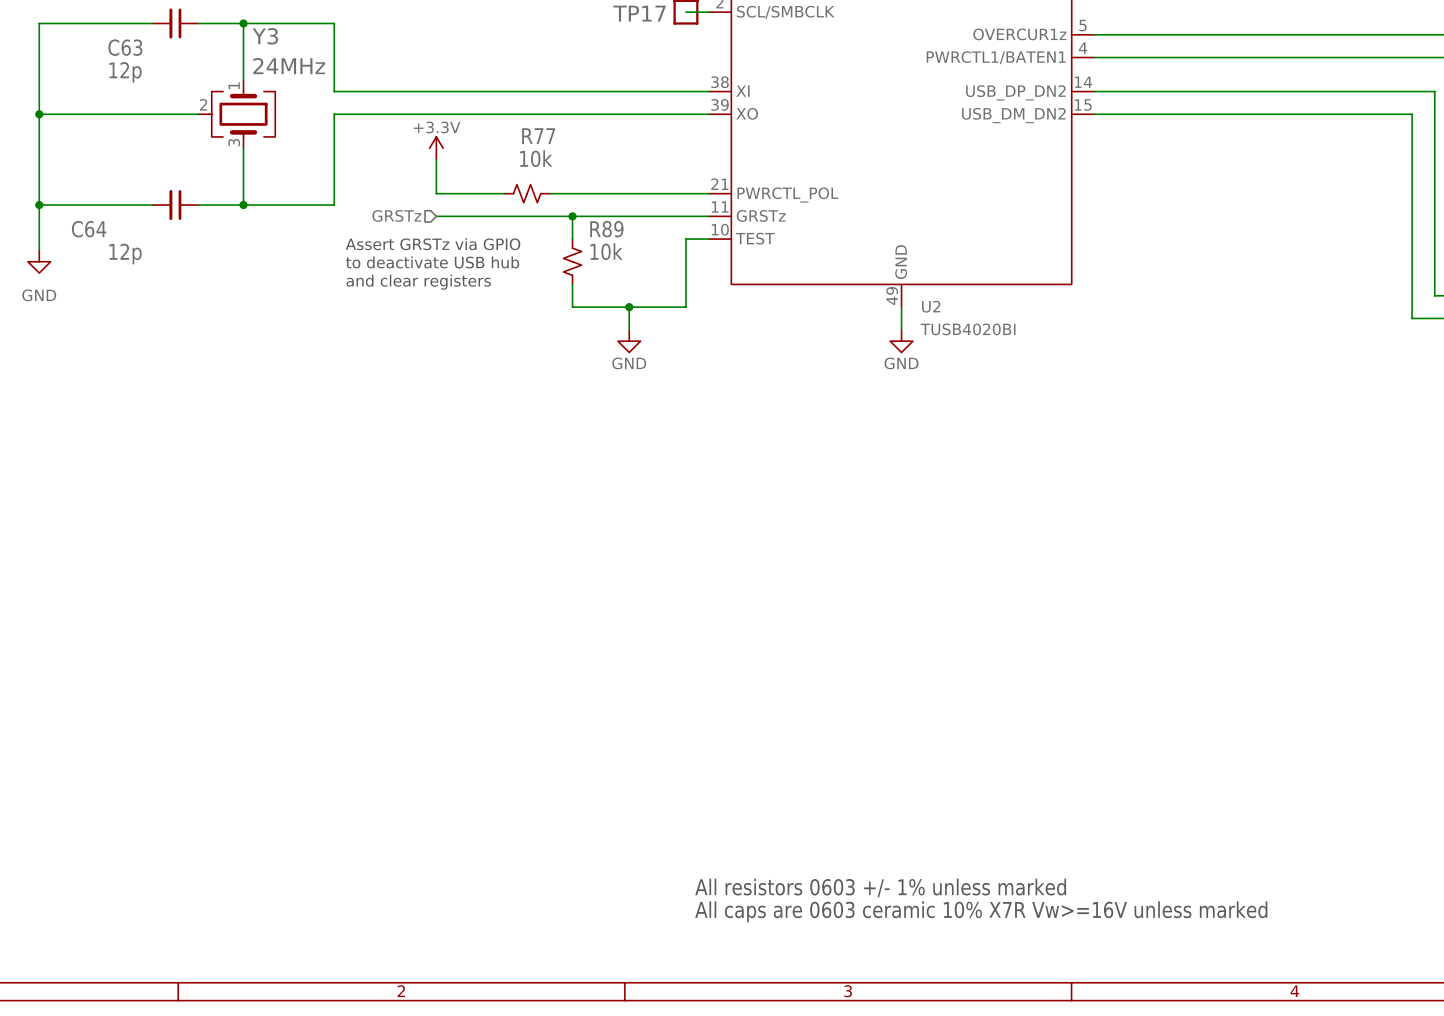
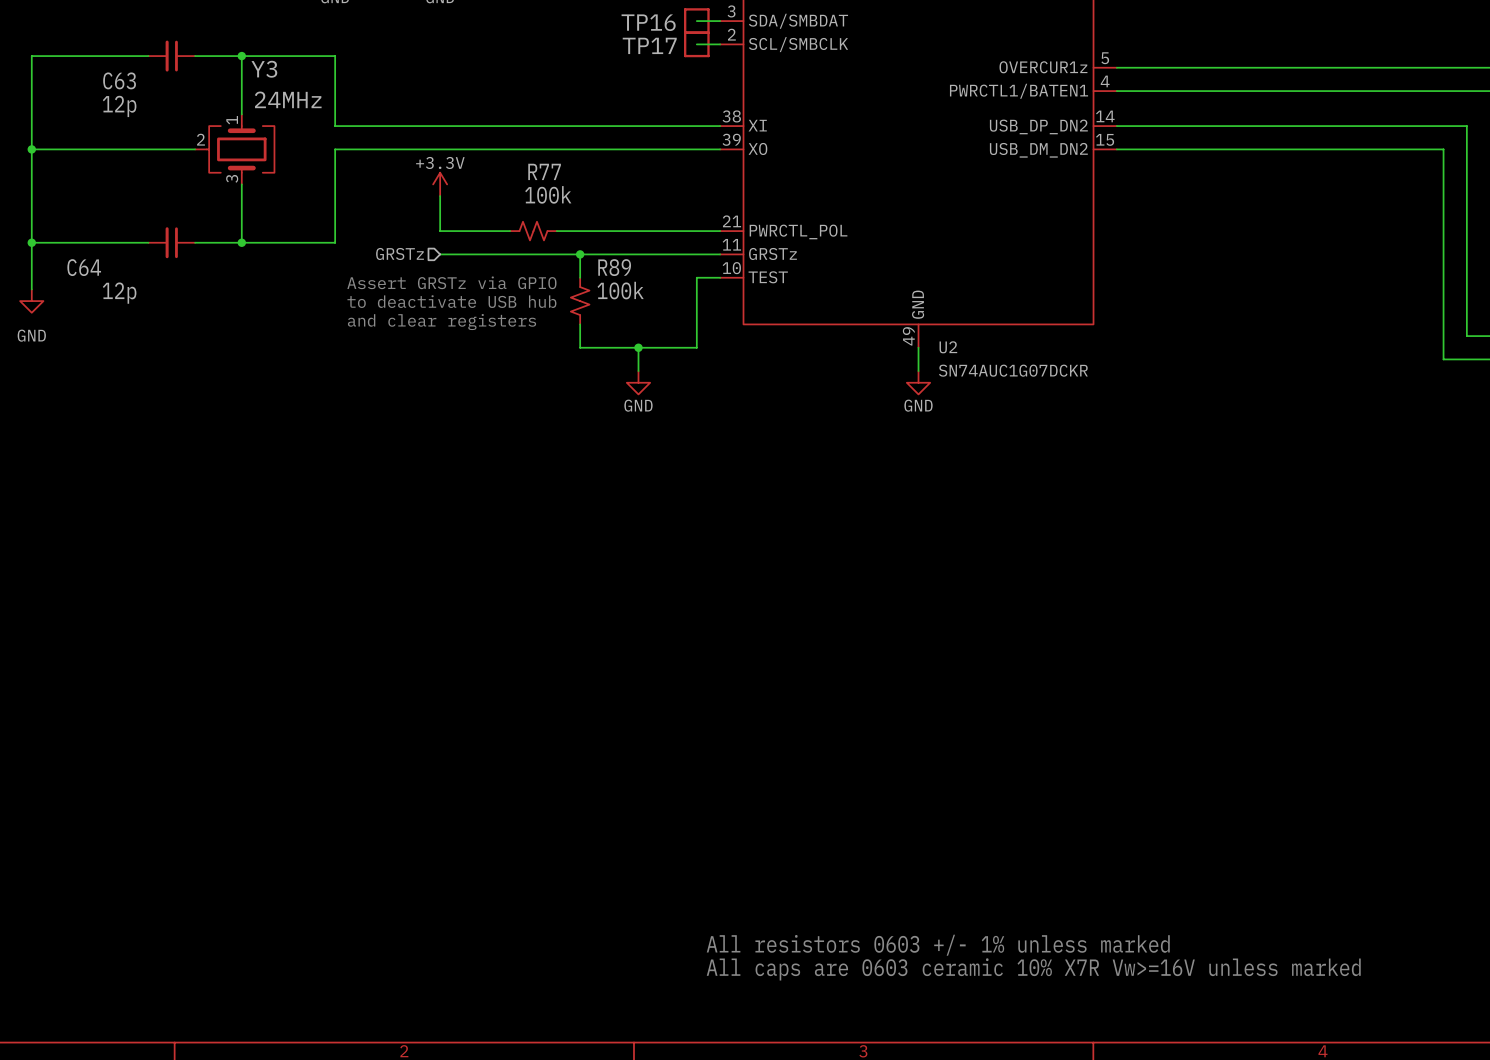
R77 value: 10k (536, 158) -> 100k (548, 194)
R89 value: 10k (606, 251) -> 100k (620, 290)
U2 value: TUSB4020BI (968, 329) -> SN74AUC1G07DCKR (1013, 370)

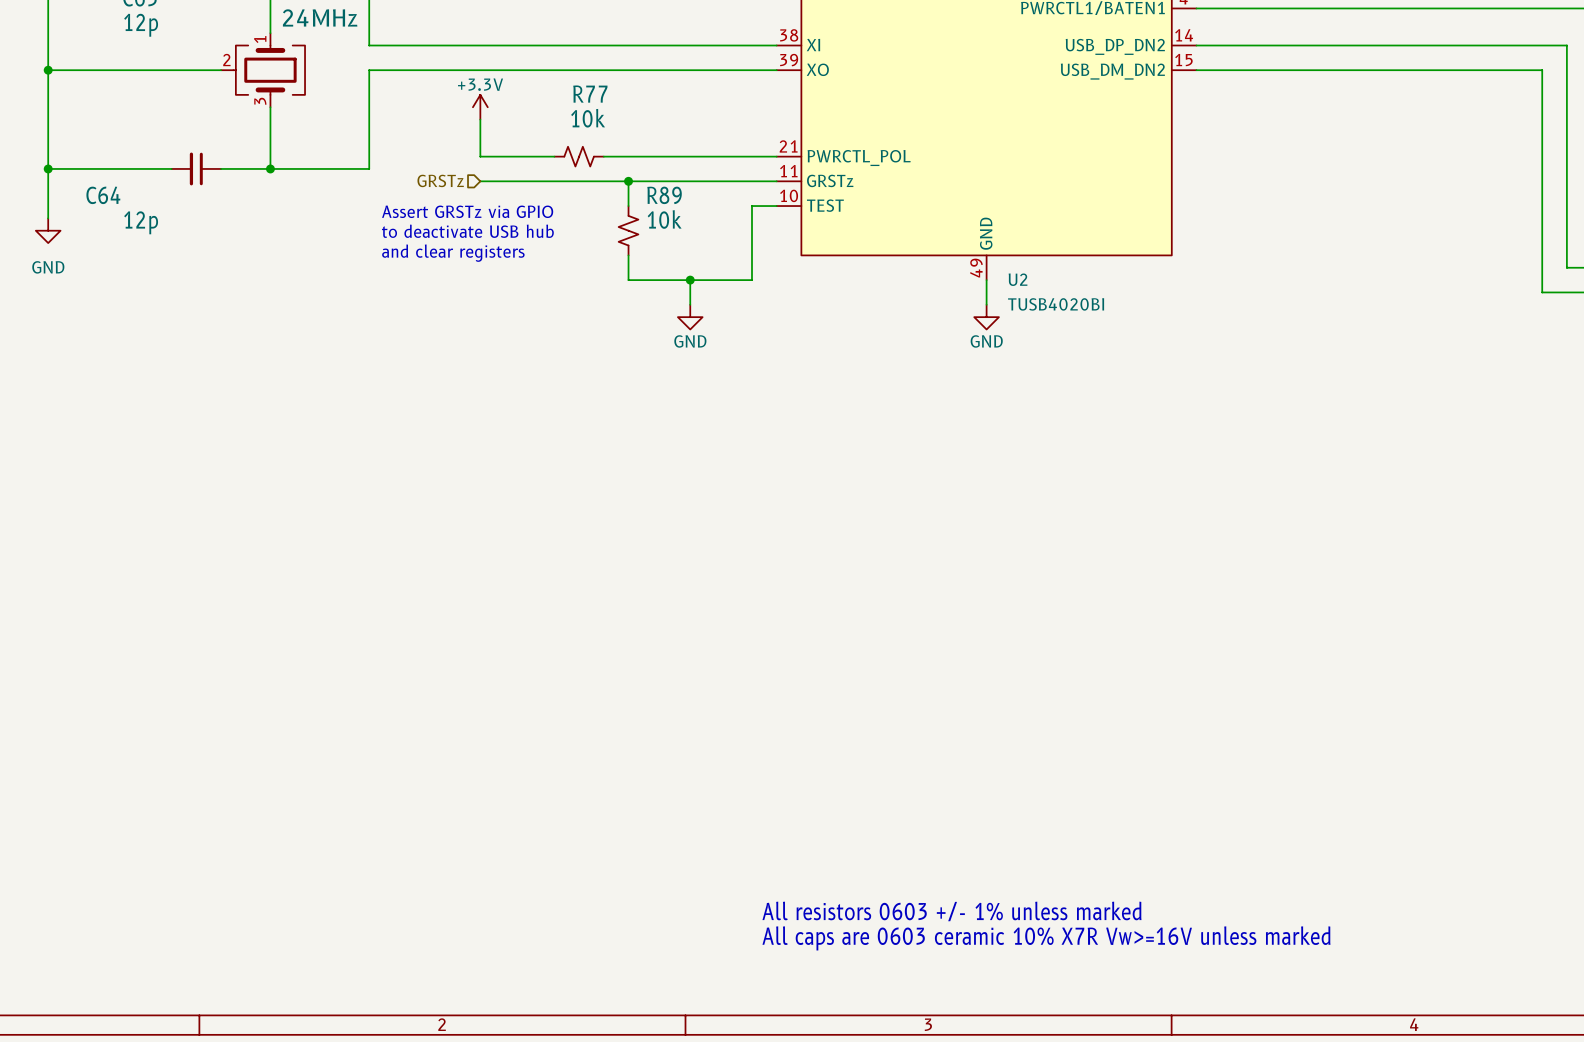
R77 value: 100k (548, 194) -> 10k (588, 118)
R89 value: 100k (620, 290) -> 10k (664, 219)
U2 value: SN74AUC1G07DCKR (1013, 370) -> TUSB4020BI (1056, 304)

